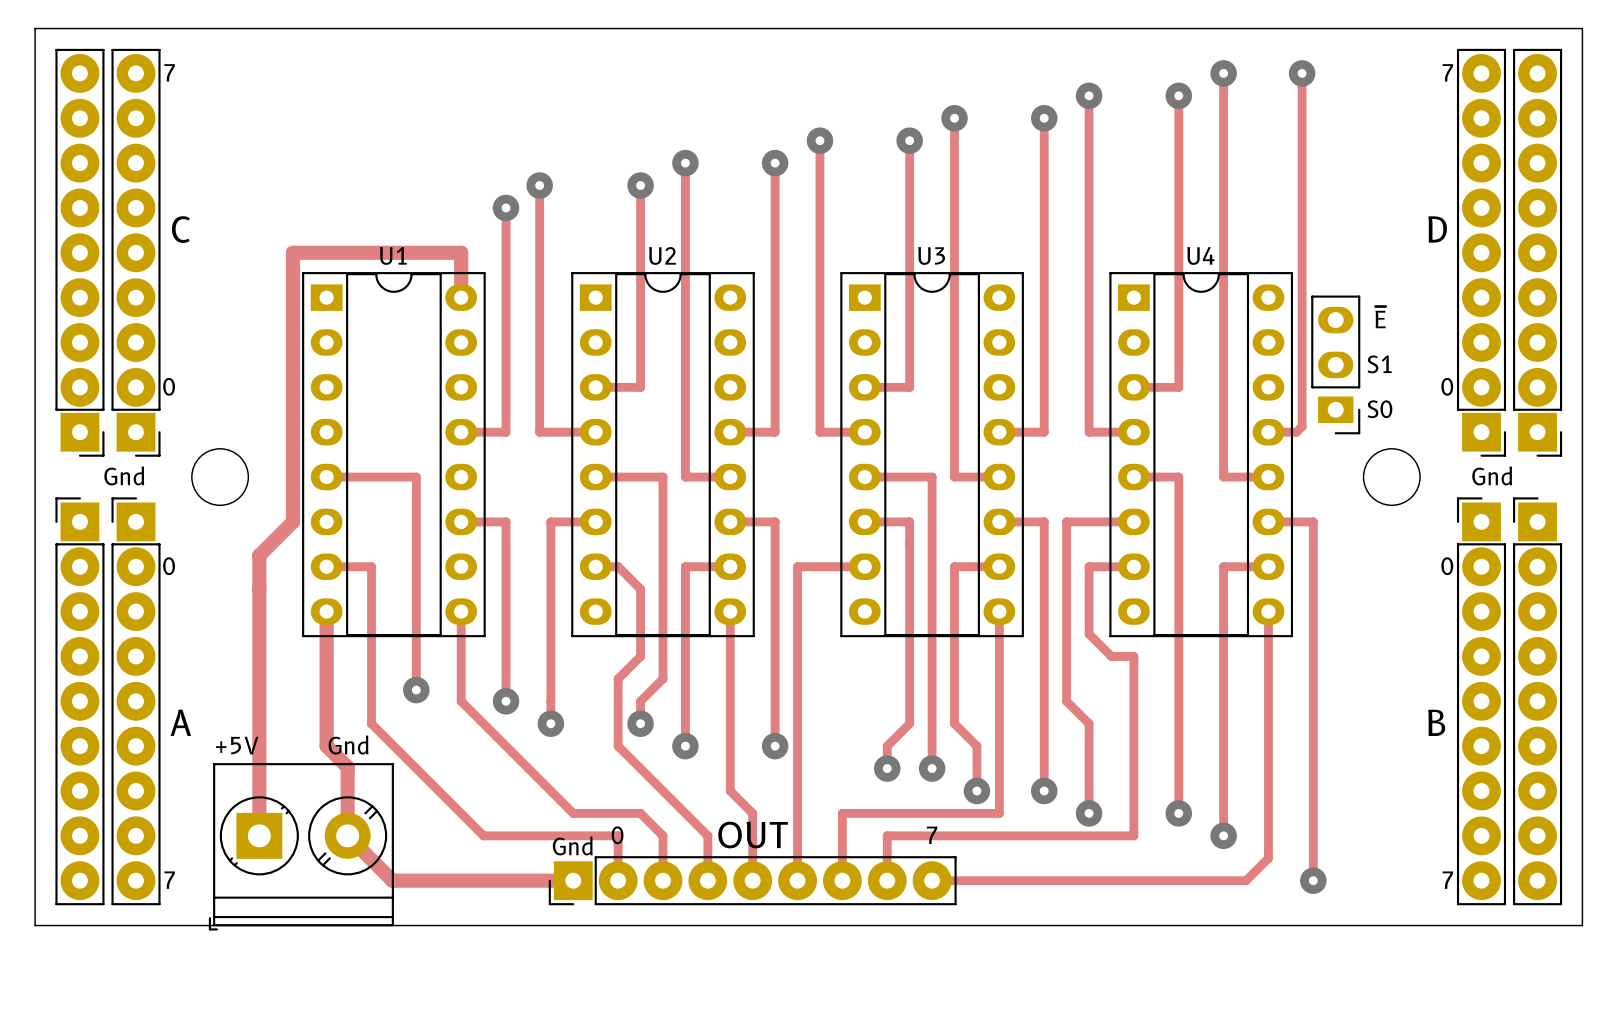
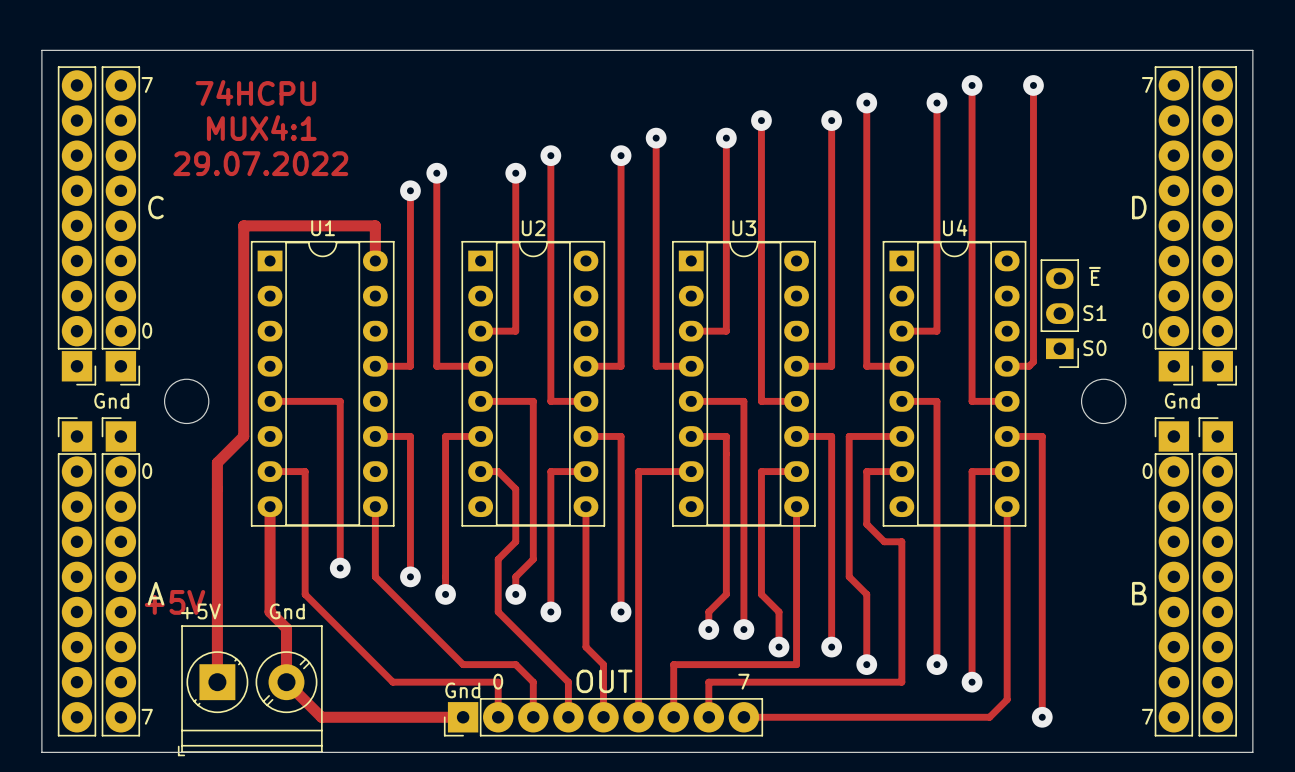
text: none -> 74HCPU (255, 92)
text: none -> MUX4:1 (261, 128)
text: none -> 29.07.2022 (260, 163)
text: none -> +5V (175, 602)

